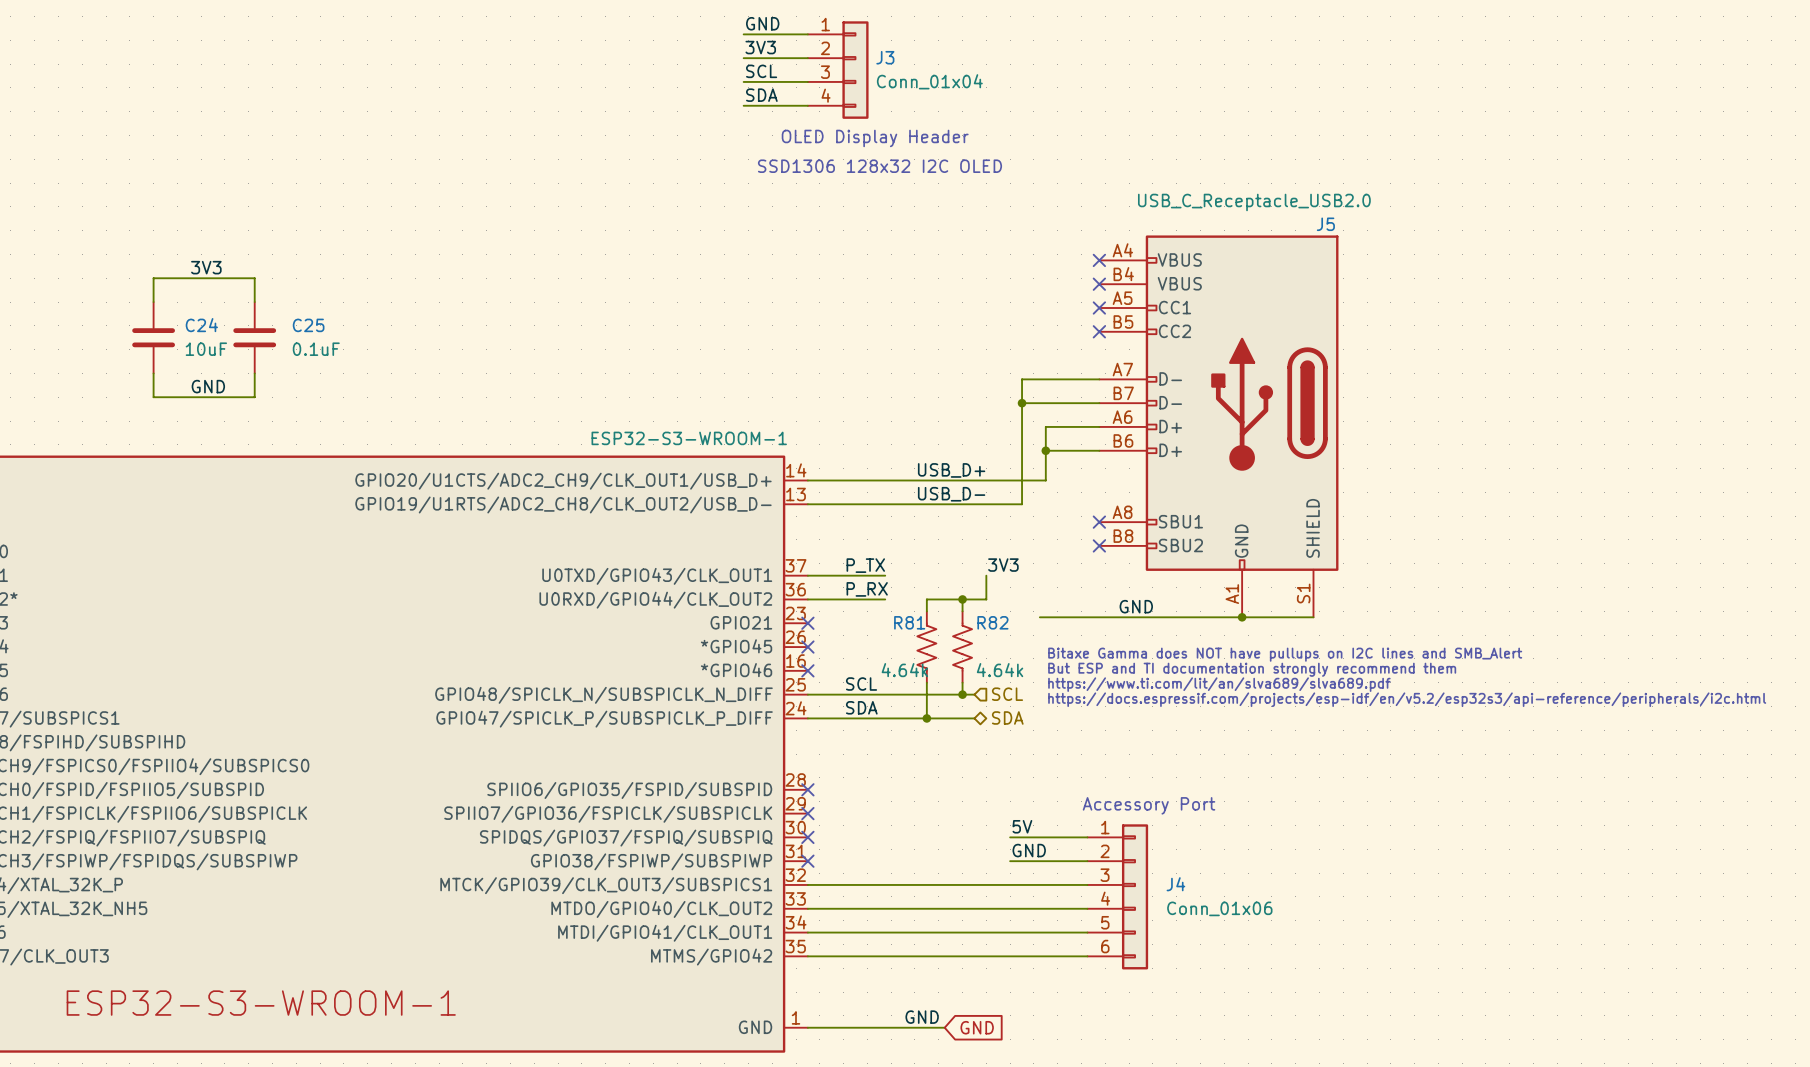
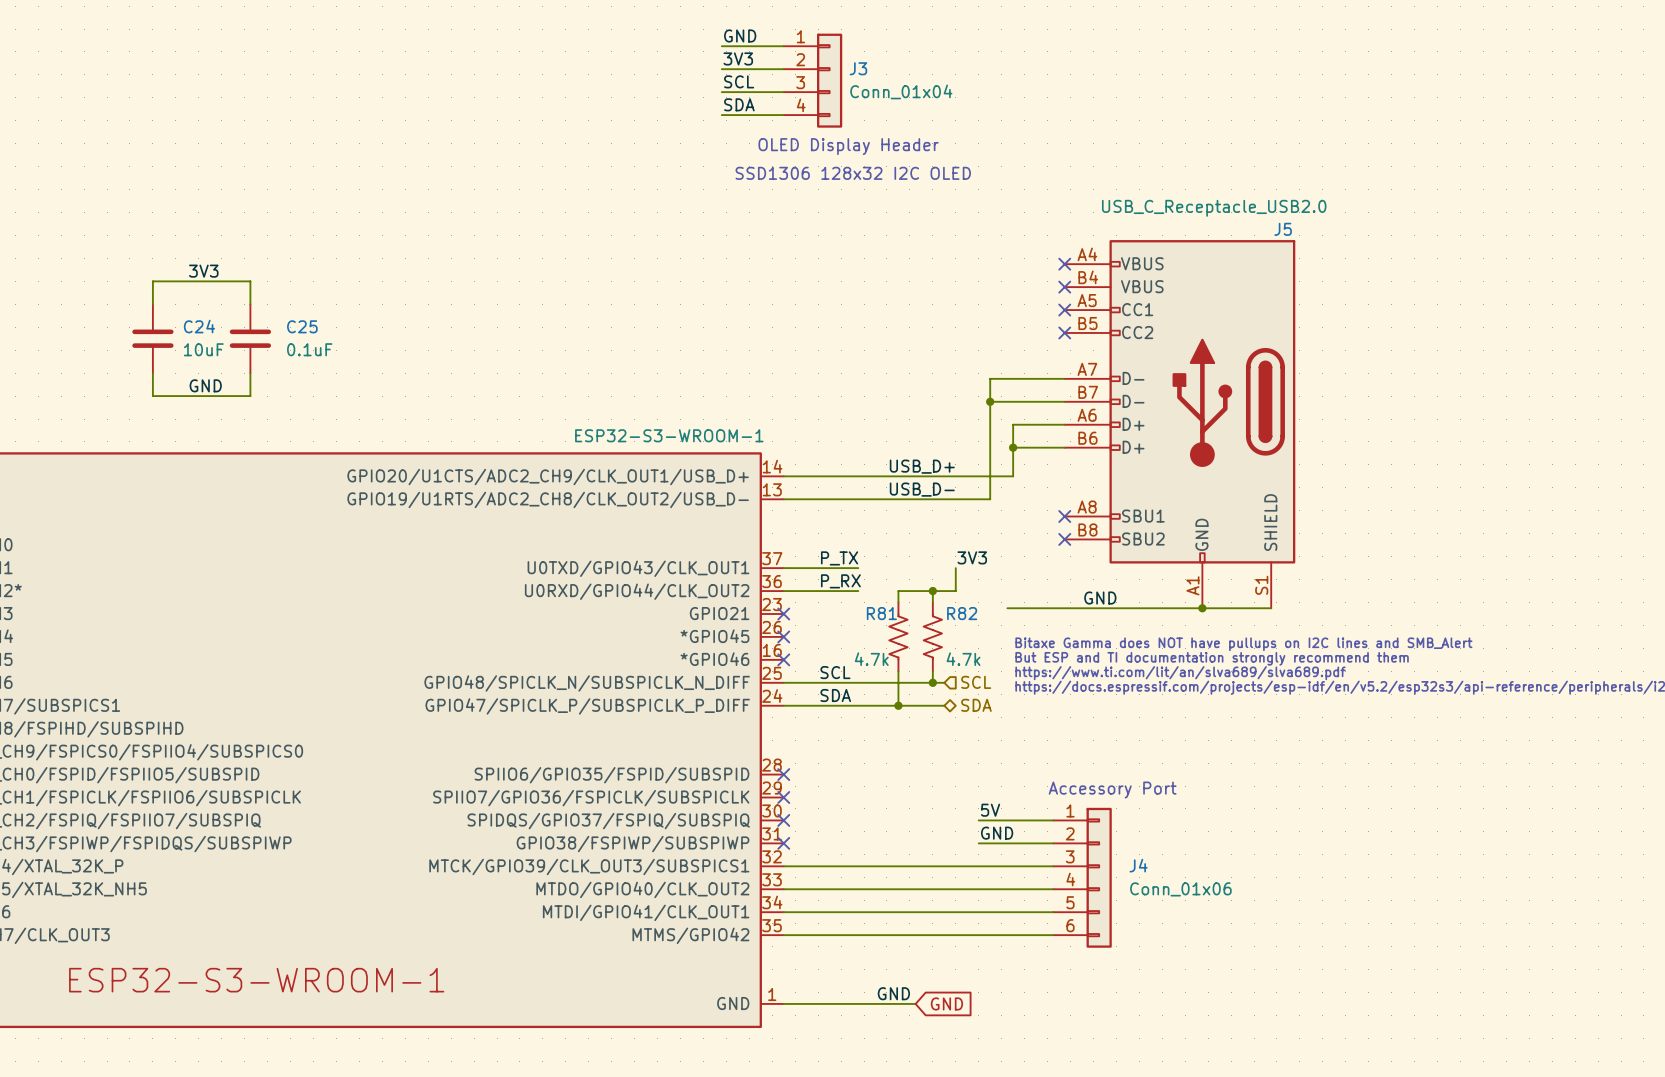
R81 value: 4.64k (904, 670) -> 4.7k (871, 659)
R82 value: 4.64k (1000, 670) -> 4.7k (963, 659)

